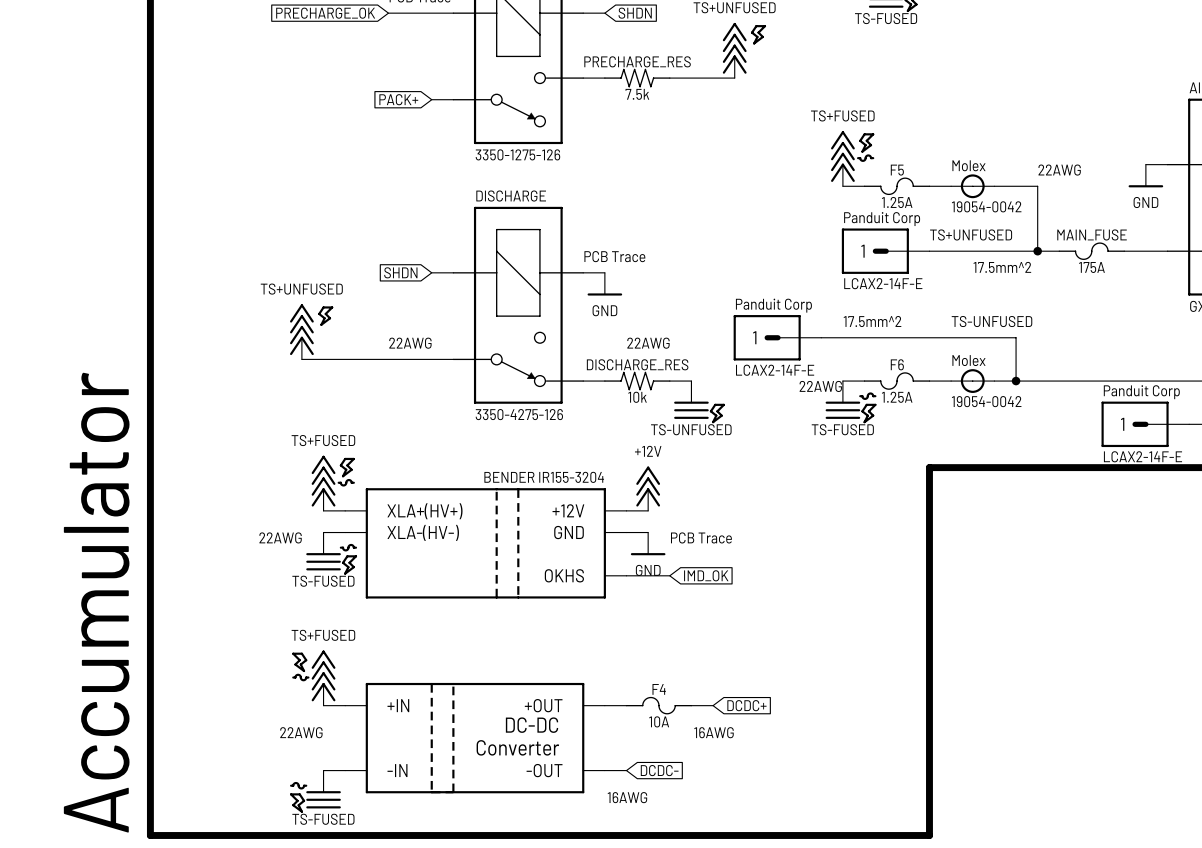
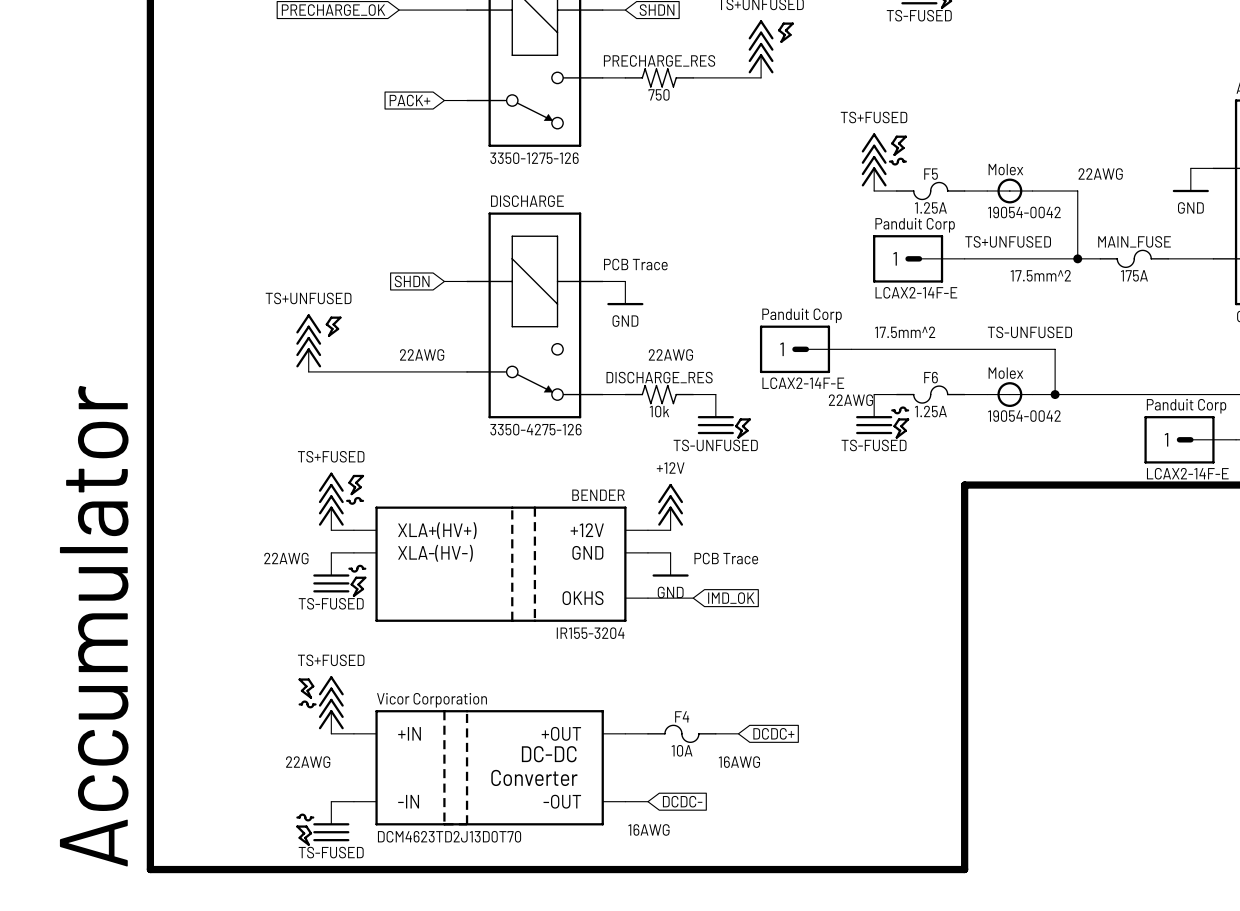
PRECHARGE_RES value: 7.5k (637, 94) -> 750 (659, 94)
part text: BENDER IR155-3204 (544, 477) -> BENDER (598, 495)
part text: none -> IR155-3204 (590, 633)
part text: none -> Vicor Corporation (432, 700)
part text: none -> DCM4623TD2J13D0T70 (449, 836)

